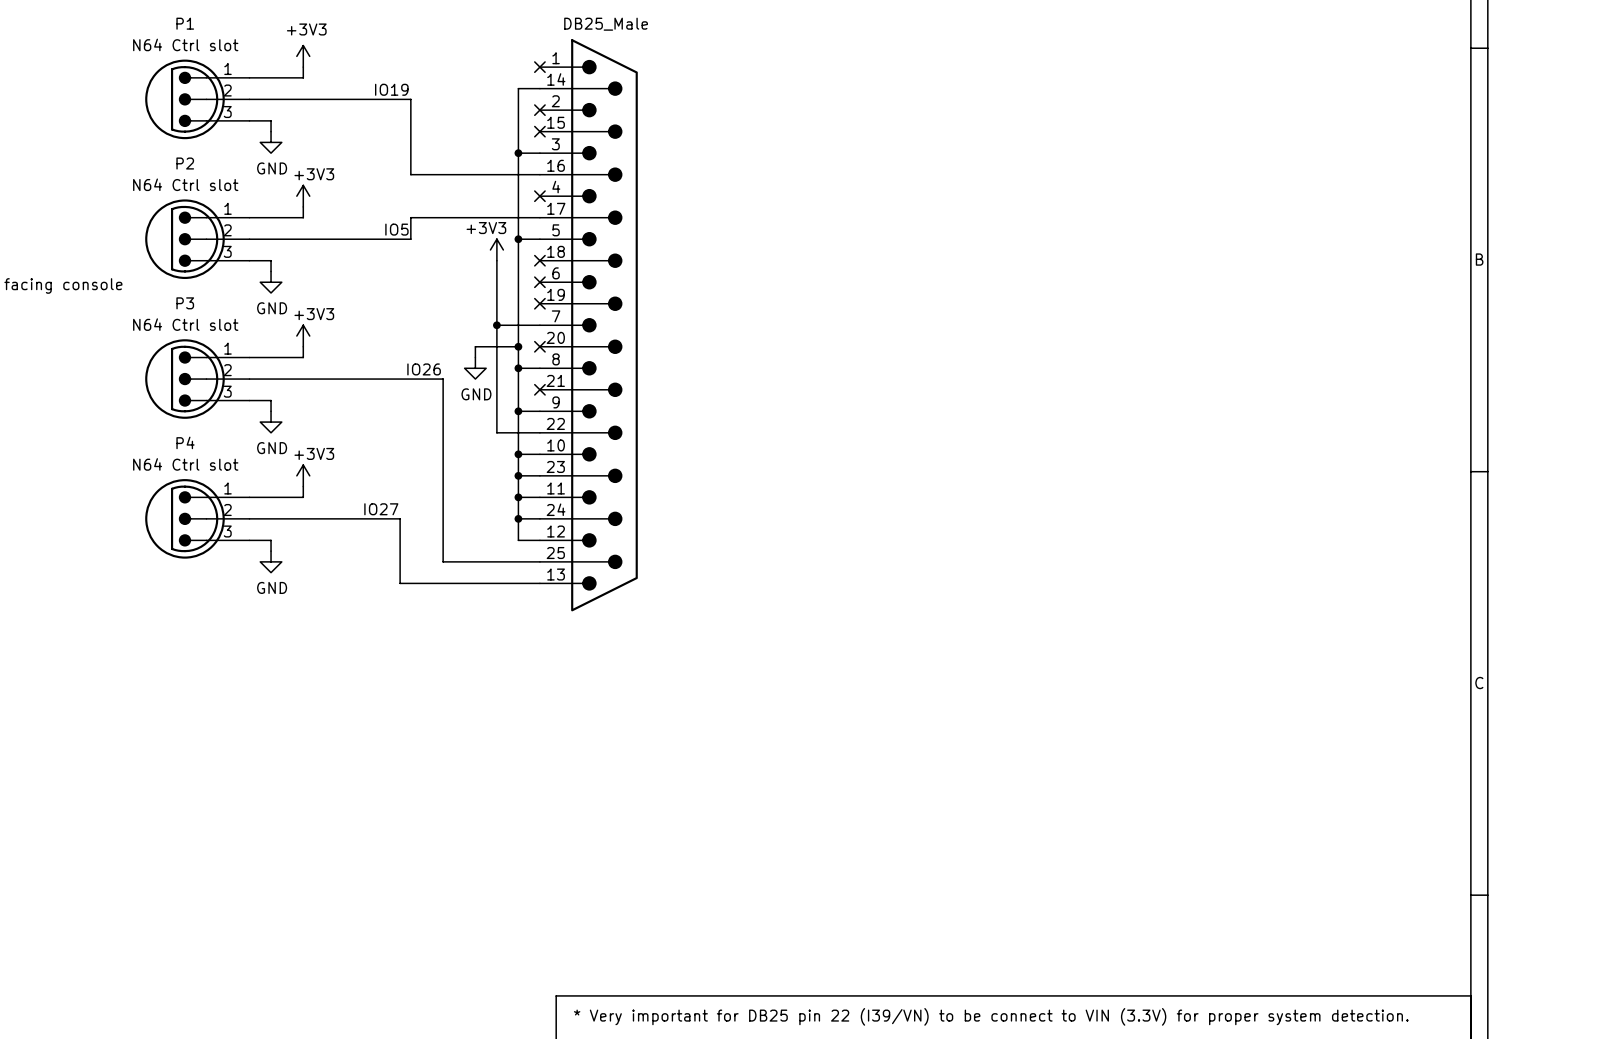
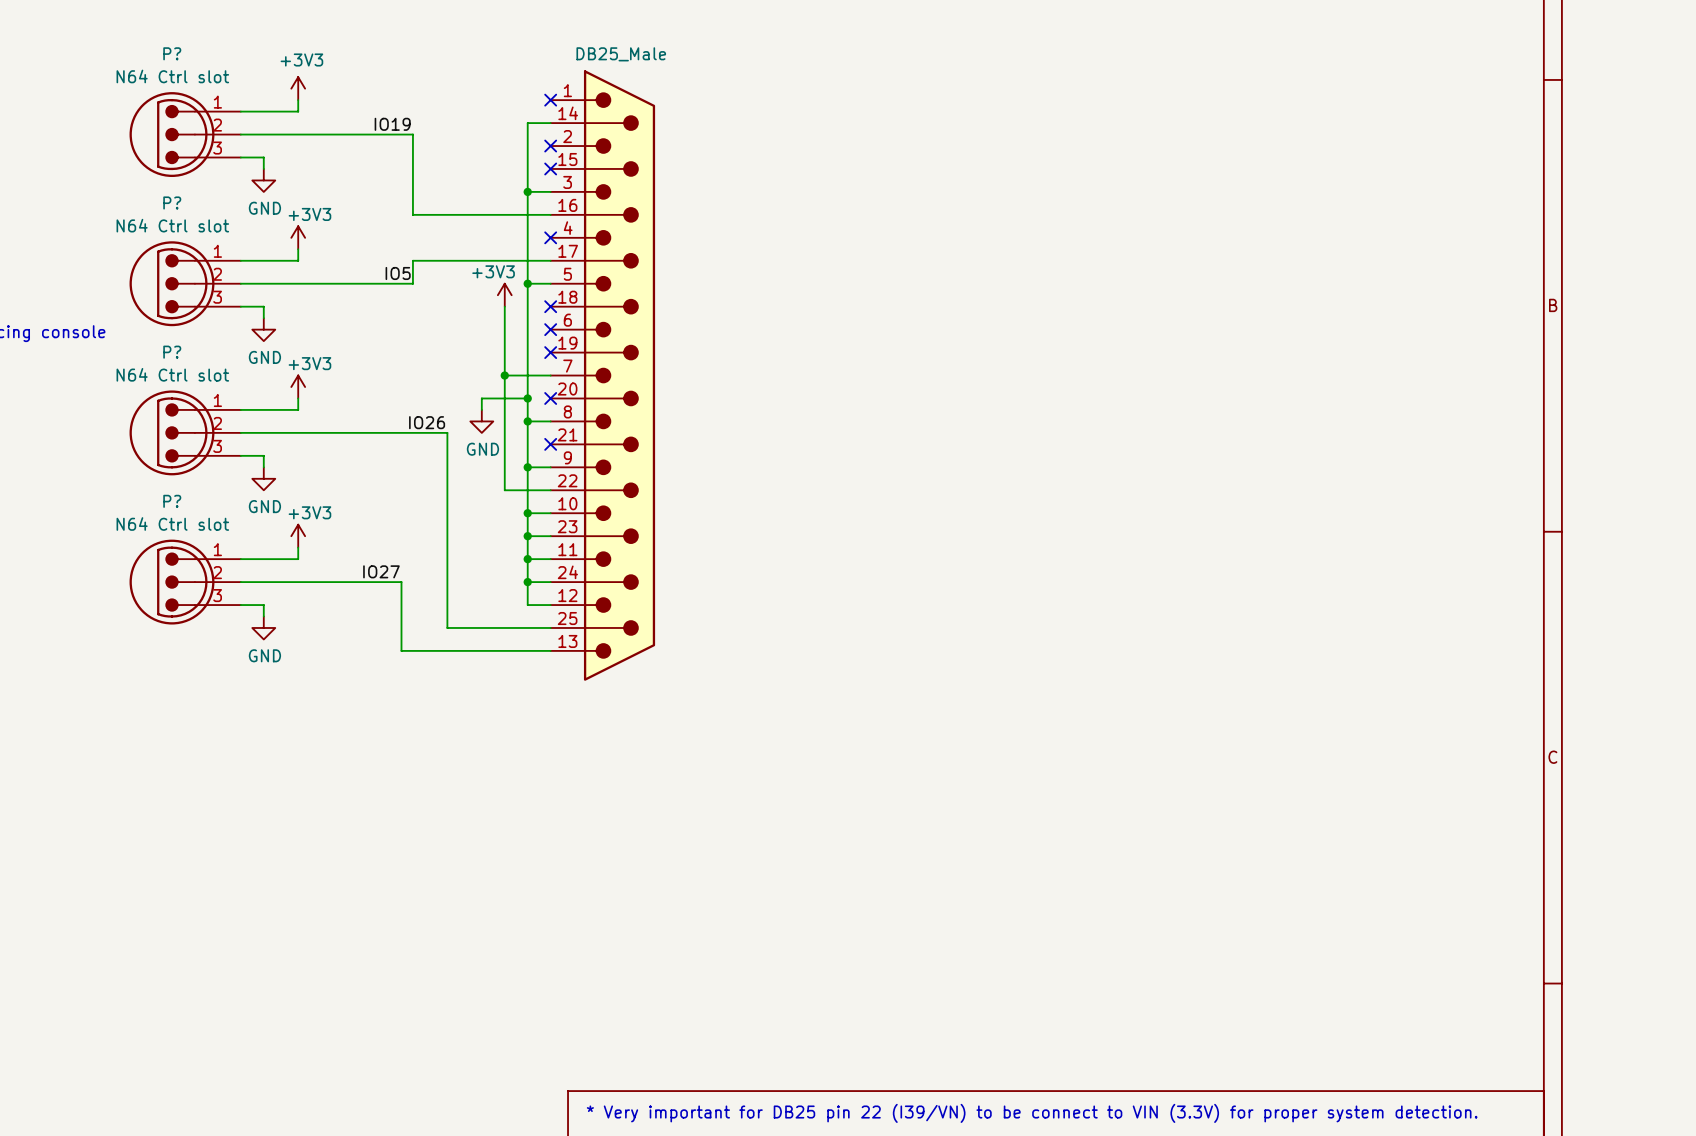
P1 name: P1 (185, 23) -> P? (172, 53)
P2 name: P2 (185, 163) -> P? (172, 202)
P3 name: P3 (185, 303) -> P? (172, 352)
P4 name: P4 (185, 442) -> P? (172, 501)

